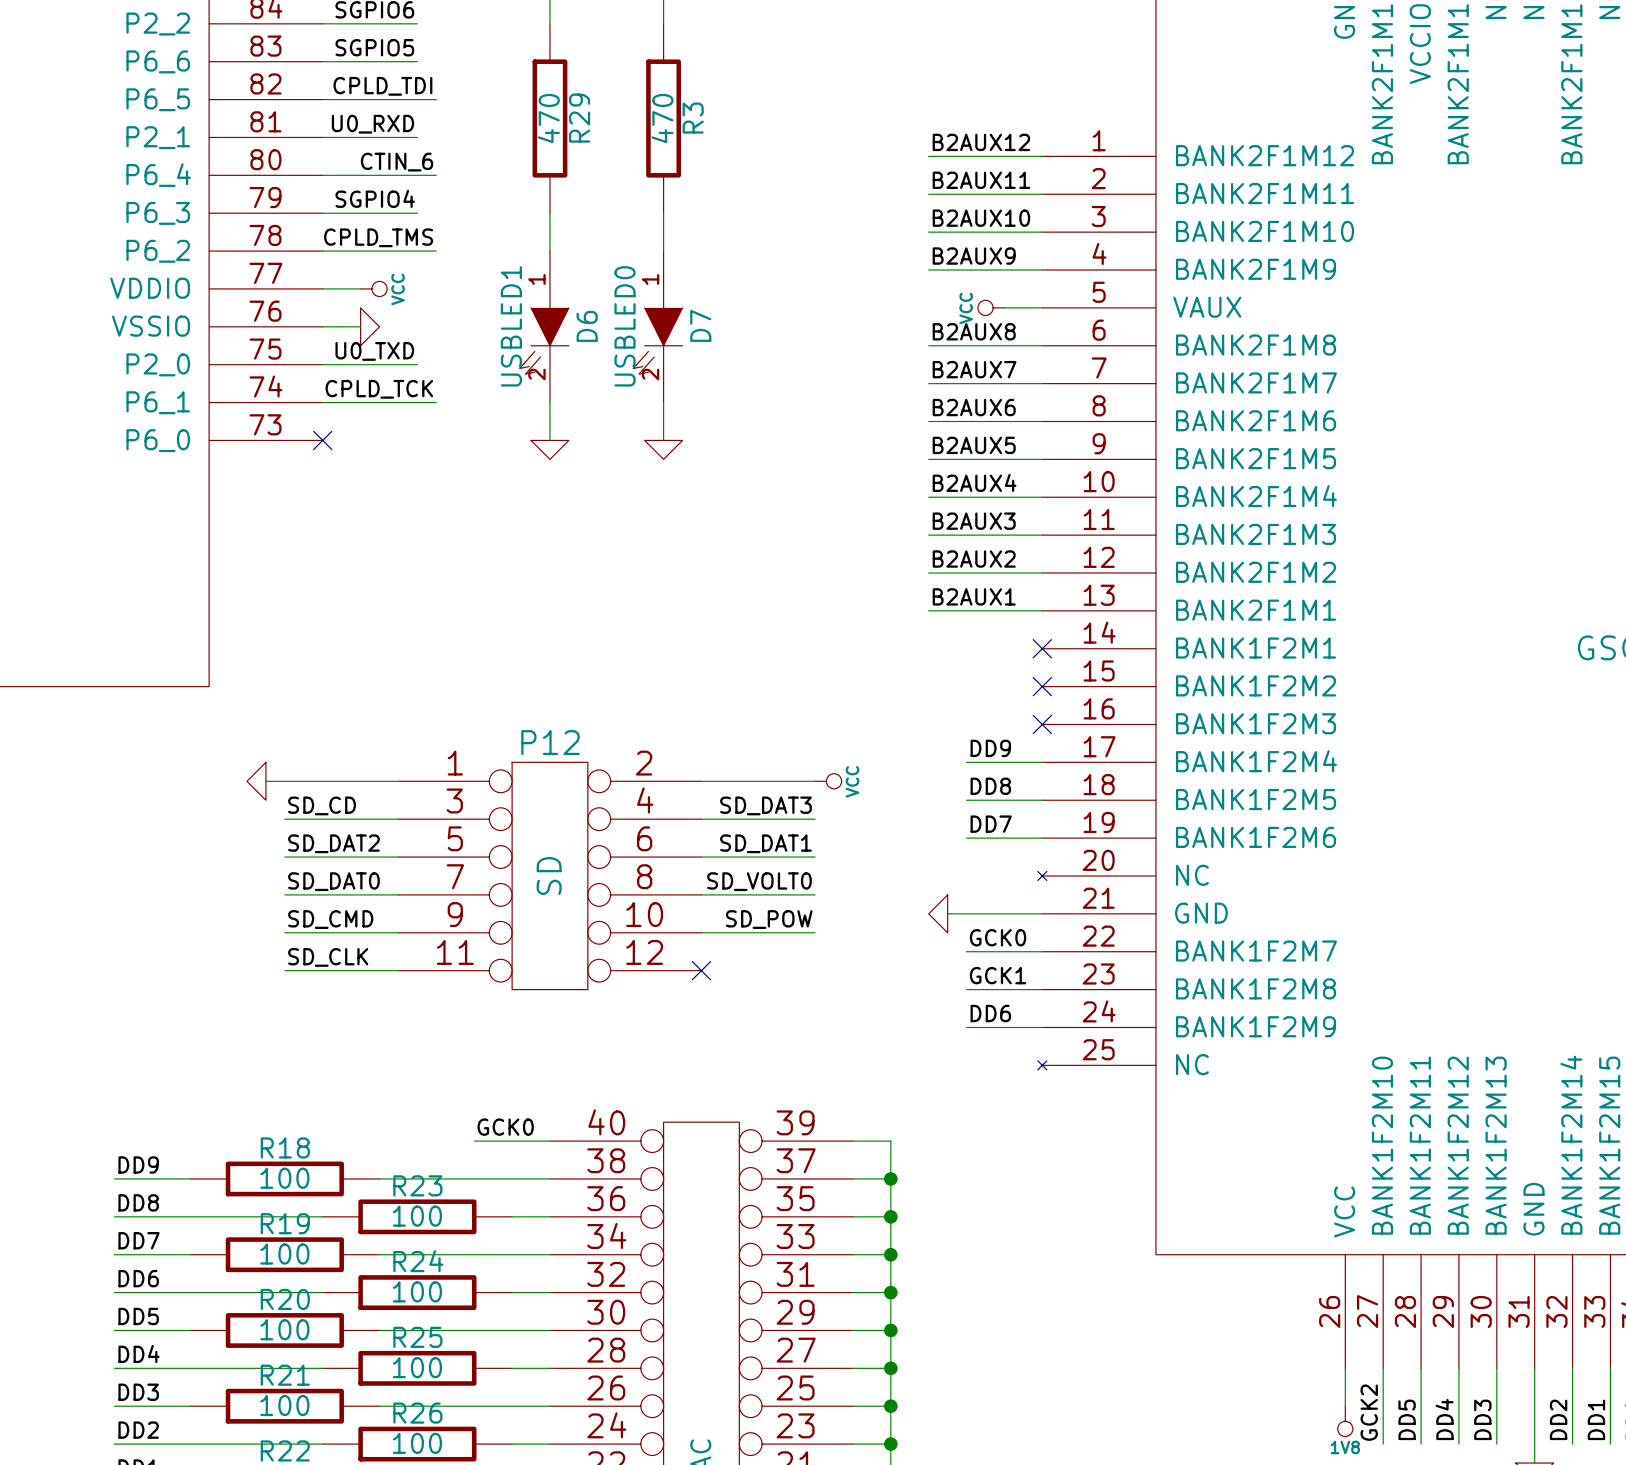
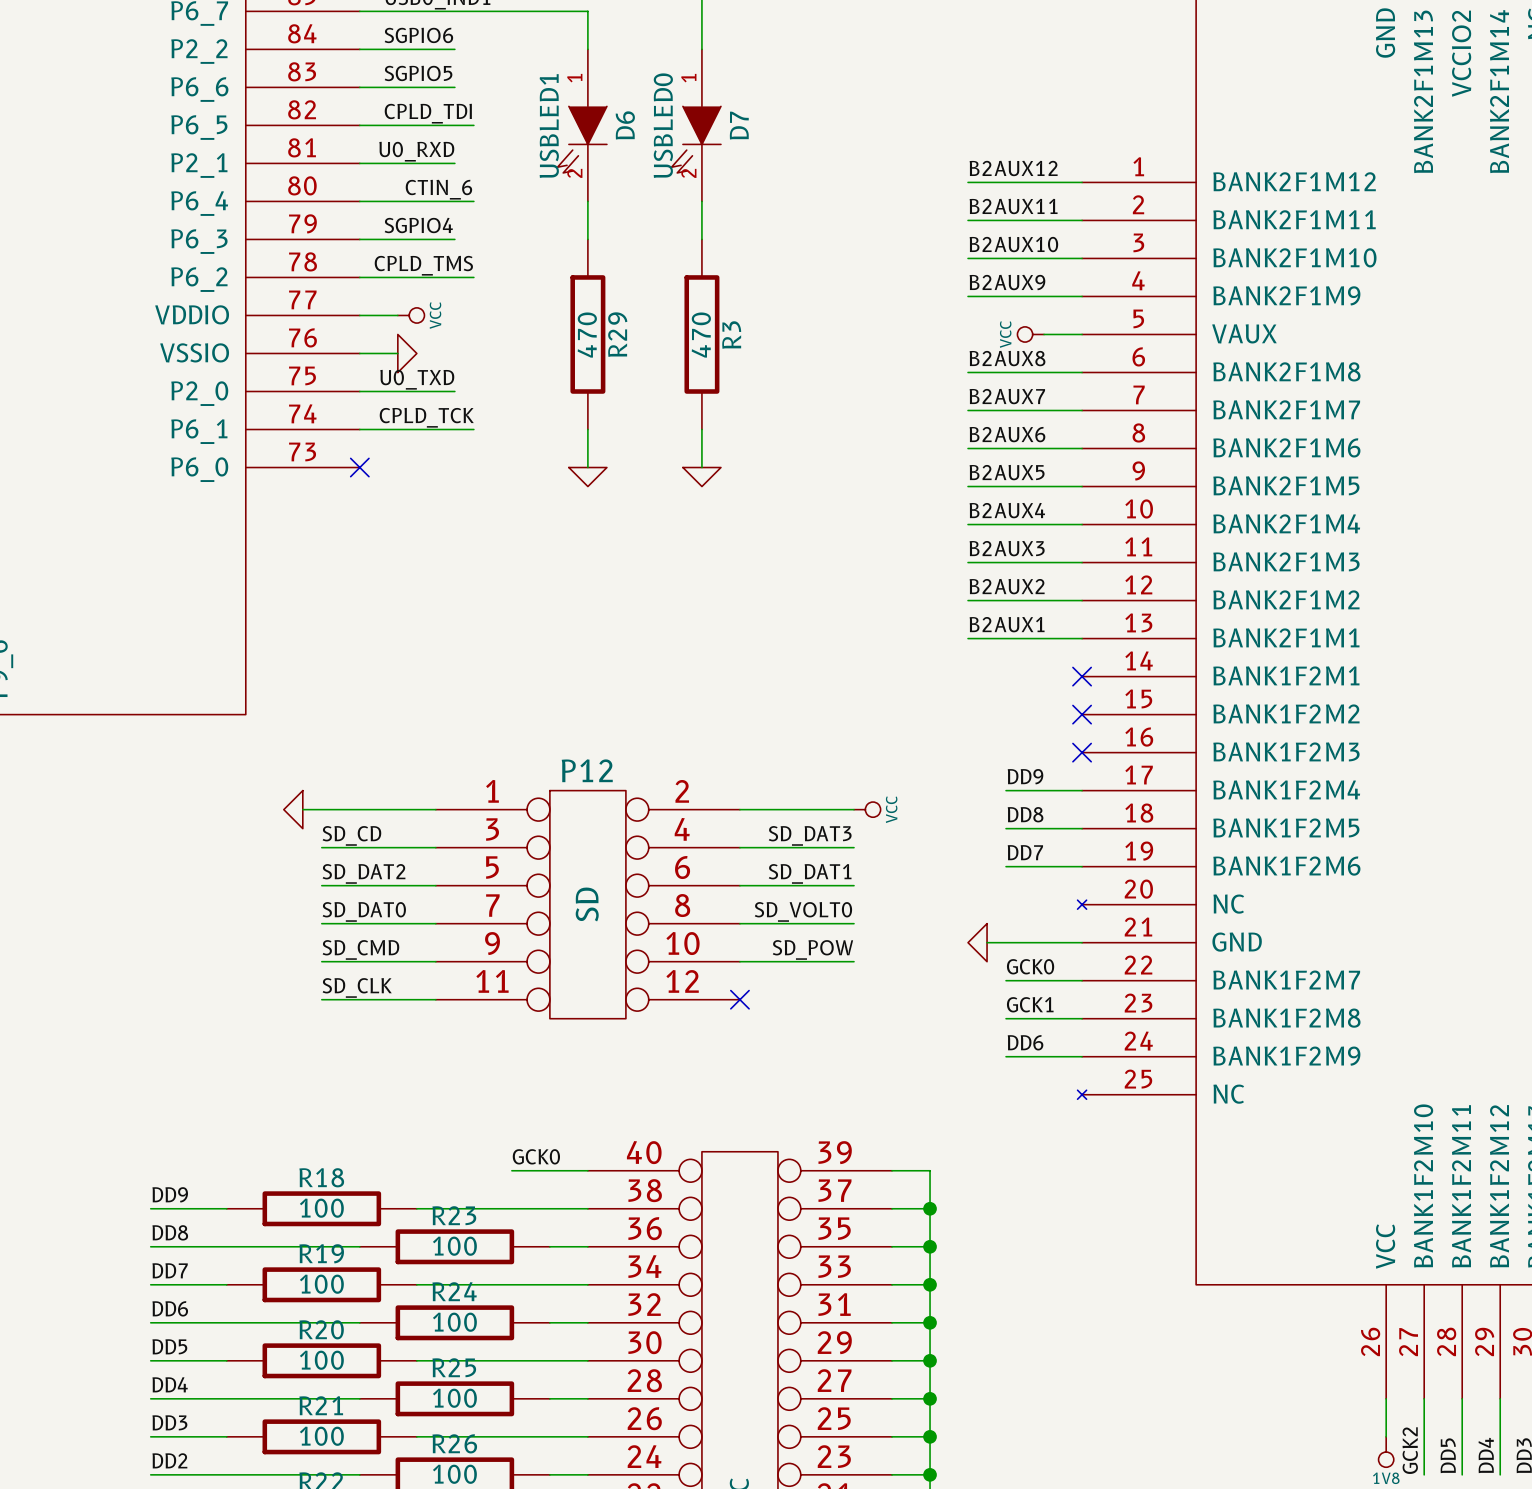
R29 position: (549, 118) -> (587, 334)
R3 position: (663, 118) -> (701, 334)
D6 position: (544, 326) -> (582, 125)
D7 position: (657, 326) -> (696, 125)

